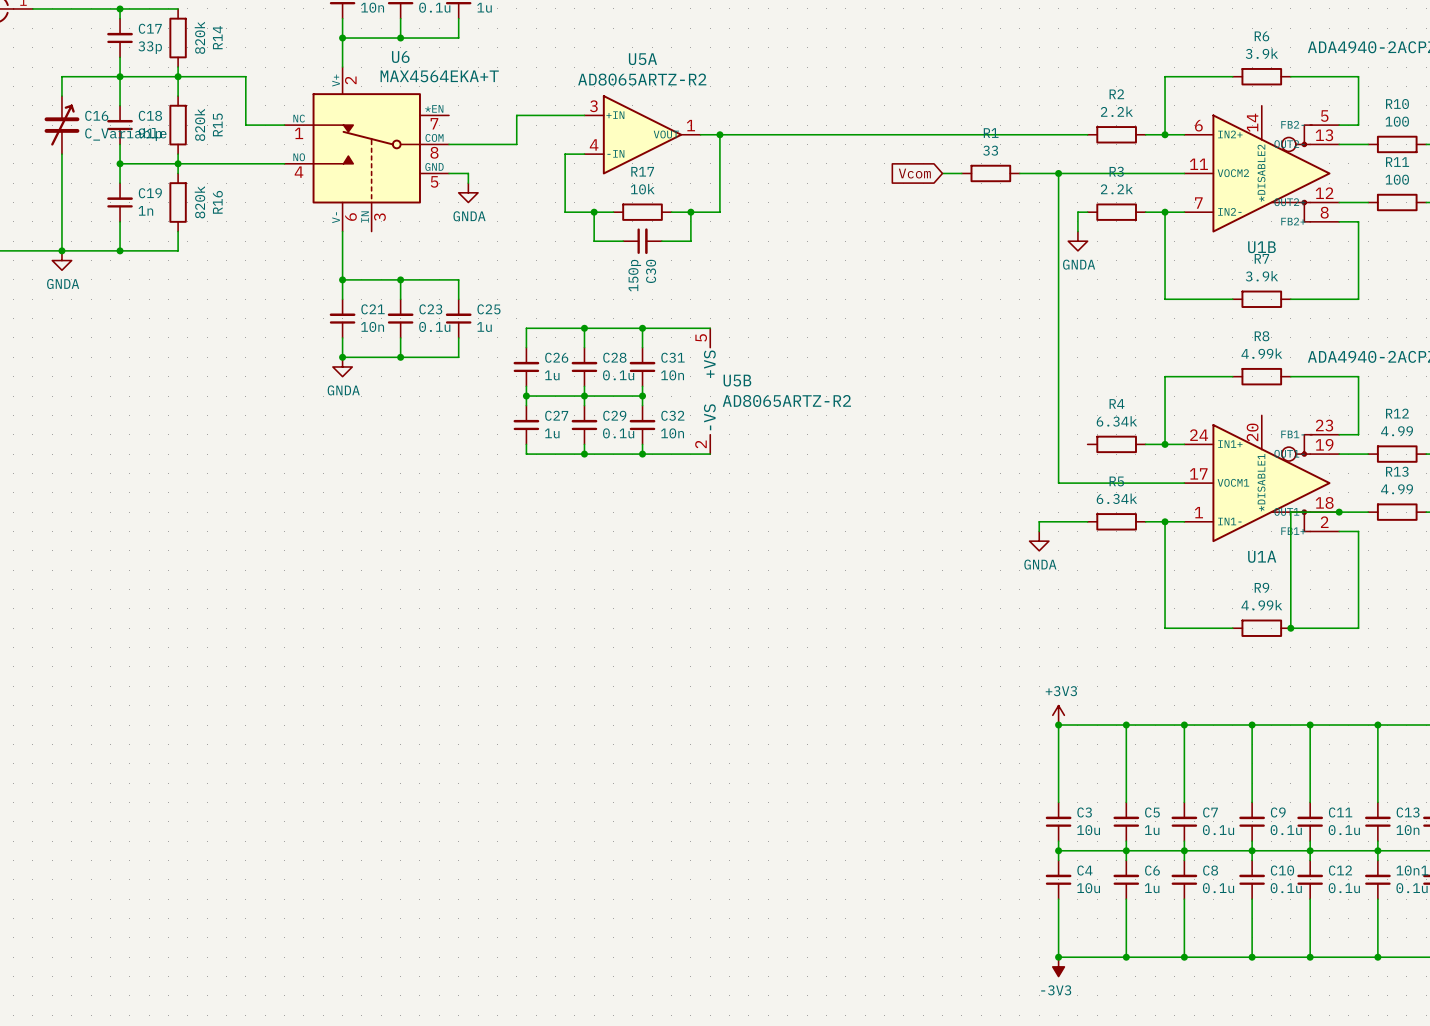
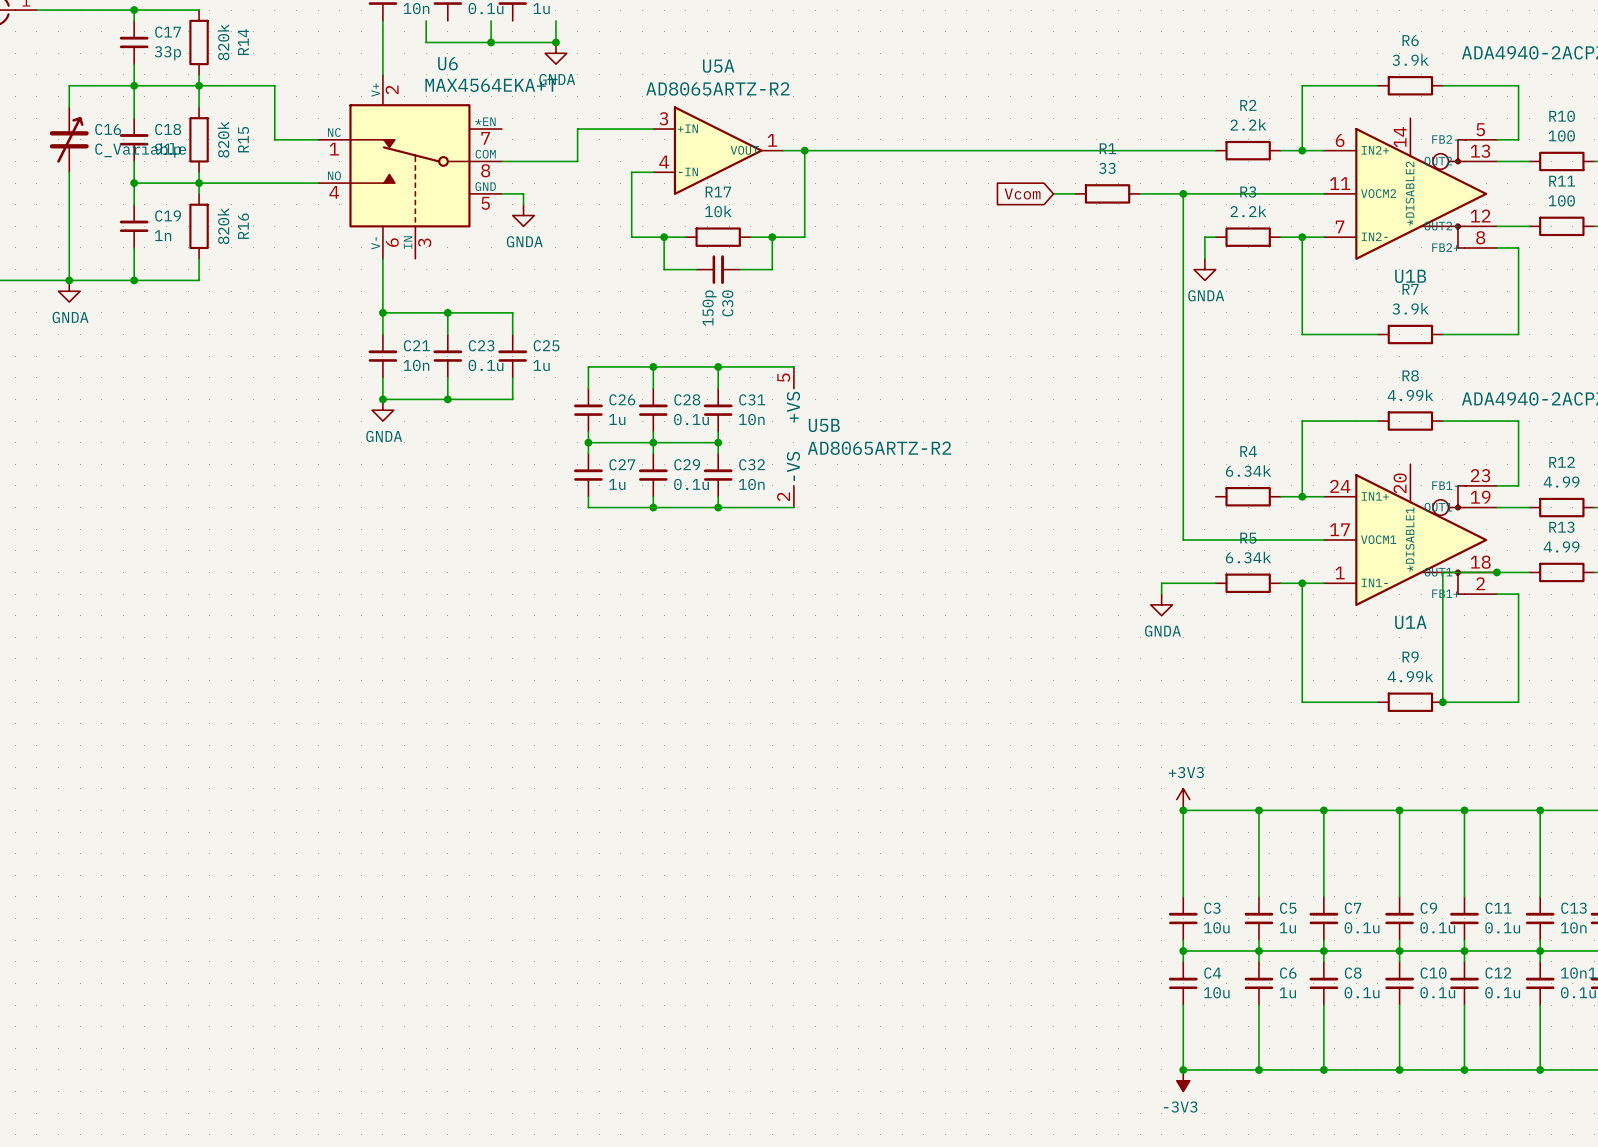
wire: (400, 18) (400, 38) -> (491, 20) (491, 42)
wire: (458, 18) (458, 38) -> (555, 20) (555, 42) (512, 42)
wire: (342, 38) (381, 38) -> (426, 20) (426, 42)
junction: (342, 38) -> none
junction position: (400, 38) -> (491, 42)
junction: none -> (555, 42)
power symbol: none -> GNDA (555, 53)

